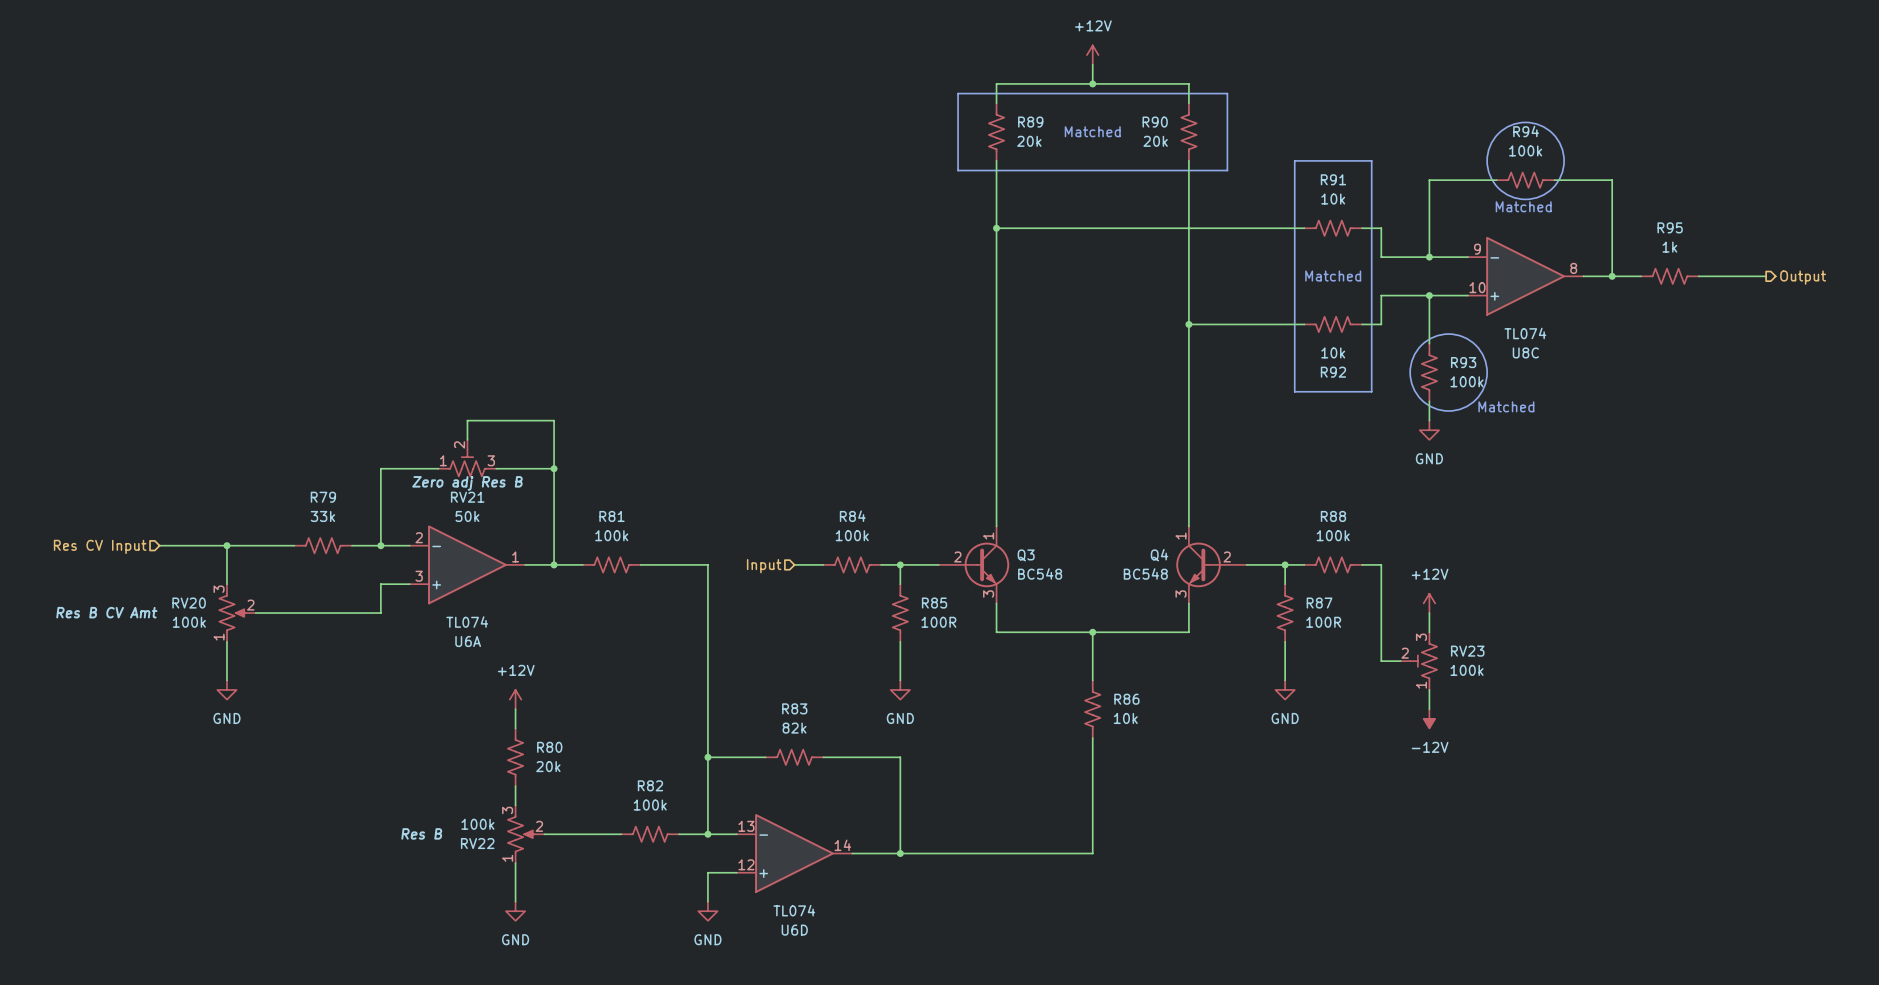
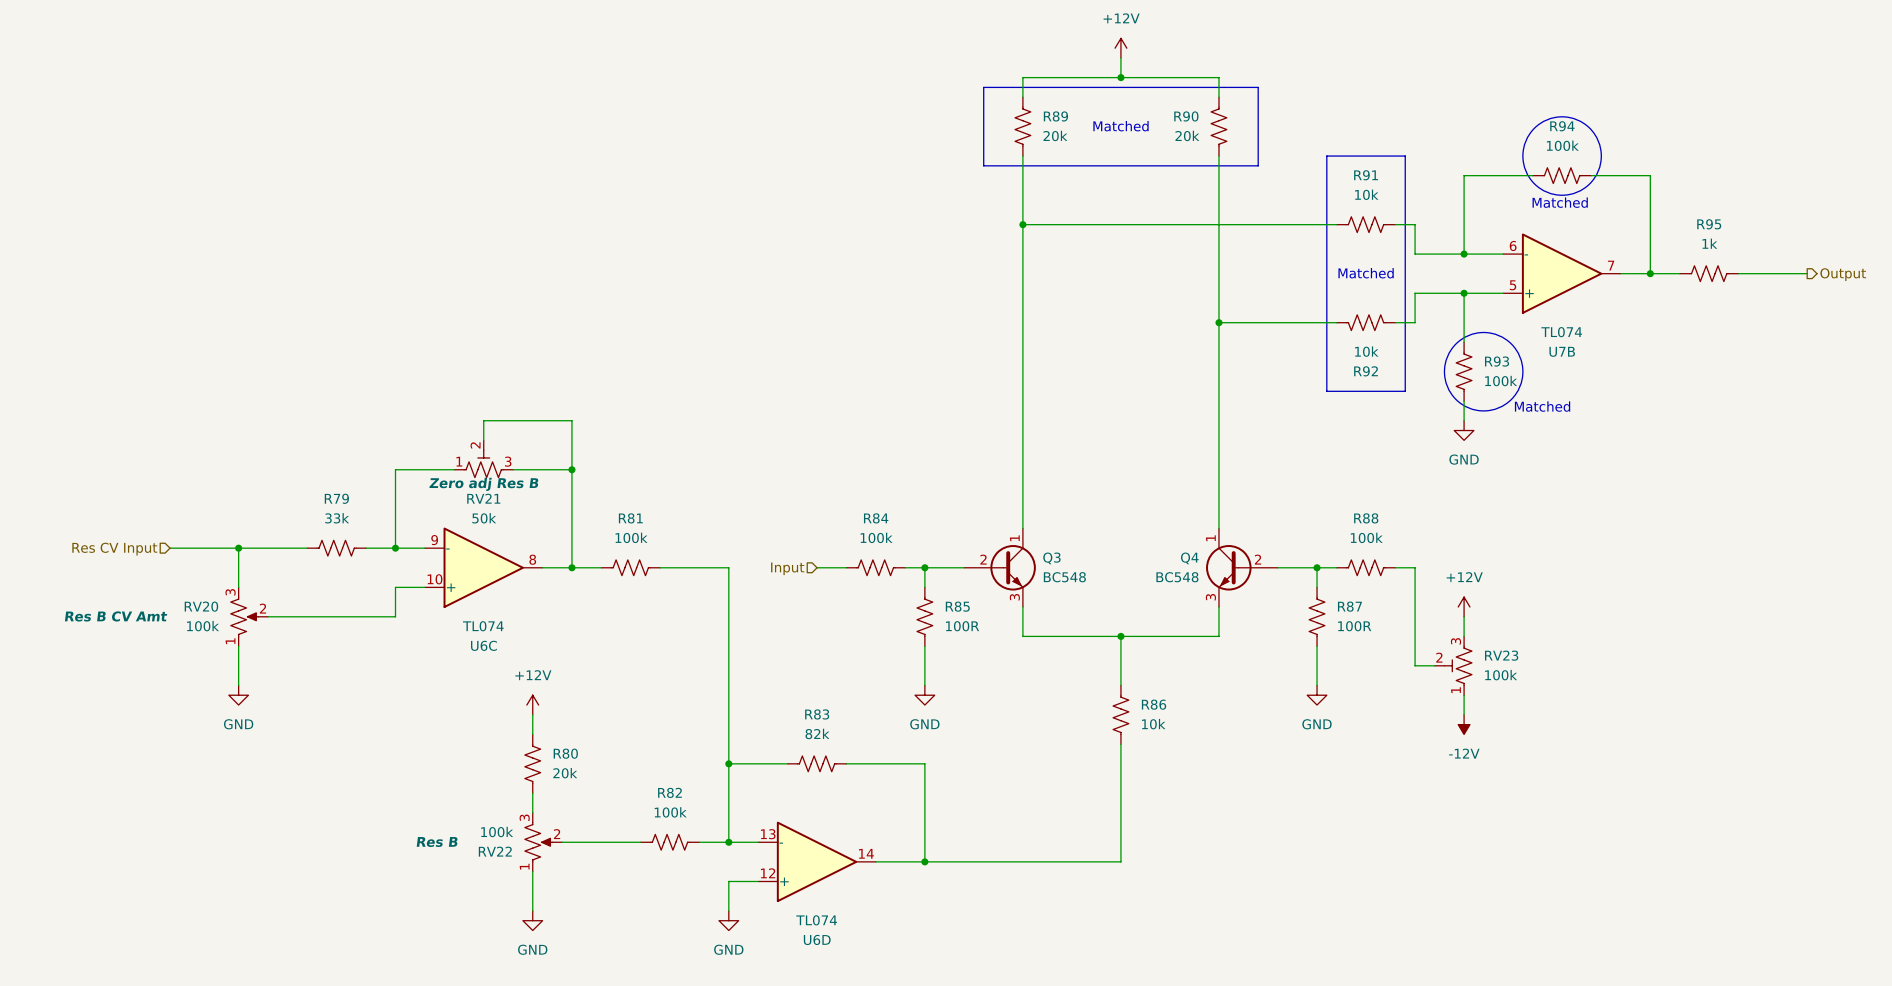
U8C pin number: 9 (1477, 249) -> 6 (1513, 245)
U8C pin number: 8 (1573, 268) -> 7 (1611, 265)
U8C pin number: 10 (1477, 287) -> 5 (1513, 285)
U8C name: U8C (1525, 352) -> U7B (1562, 351)
U6A pin number: 2 (419, 537) -> 9 (434, 540)
U6A pin number: 1 (515, 556) -> 8 (532, 559)
U6A pin number: 3 (419, 576) -> 10 (435, 579)
U6A name: U6A (468, 641) -> U6C (483, 645)

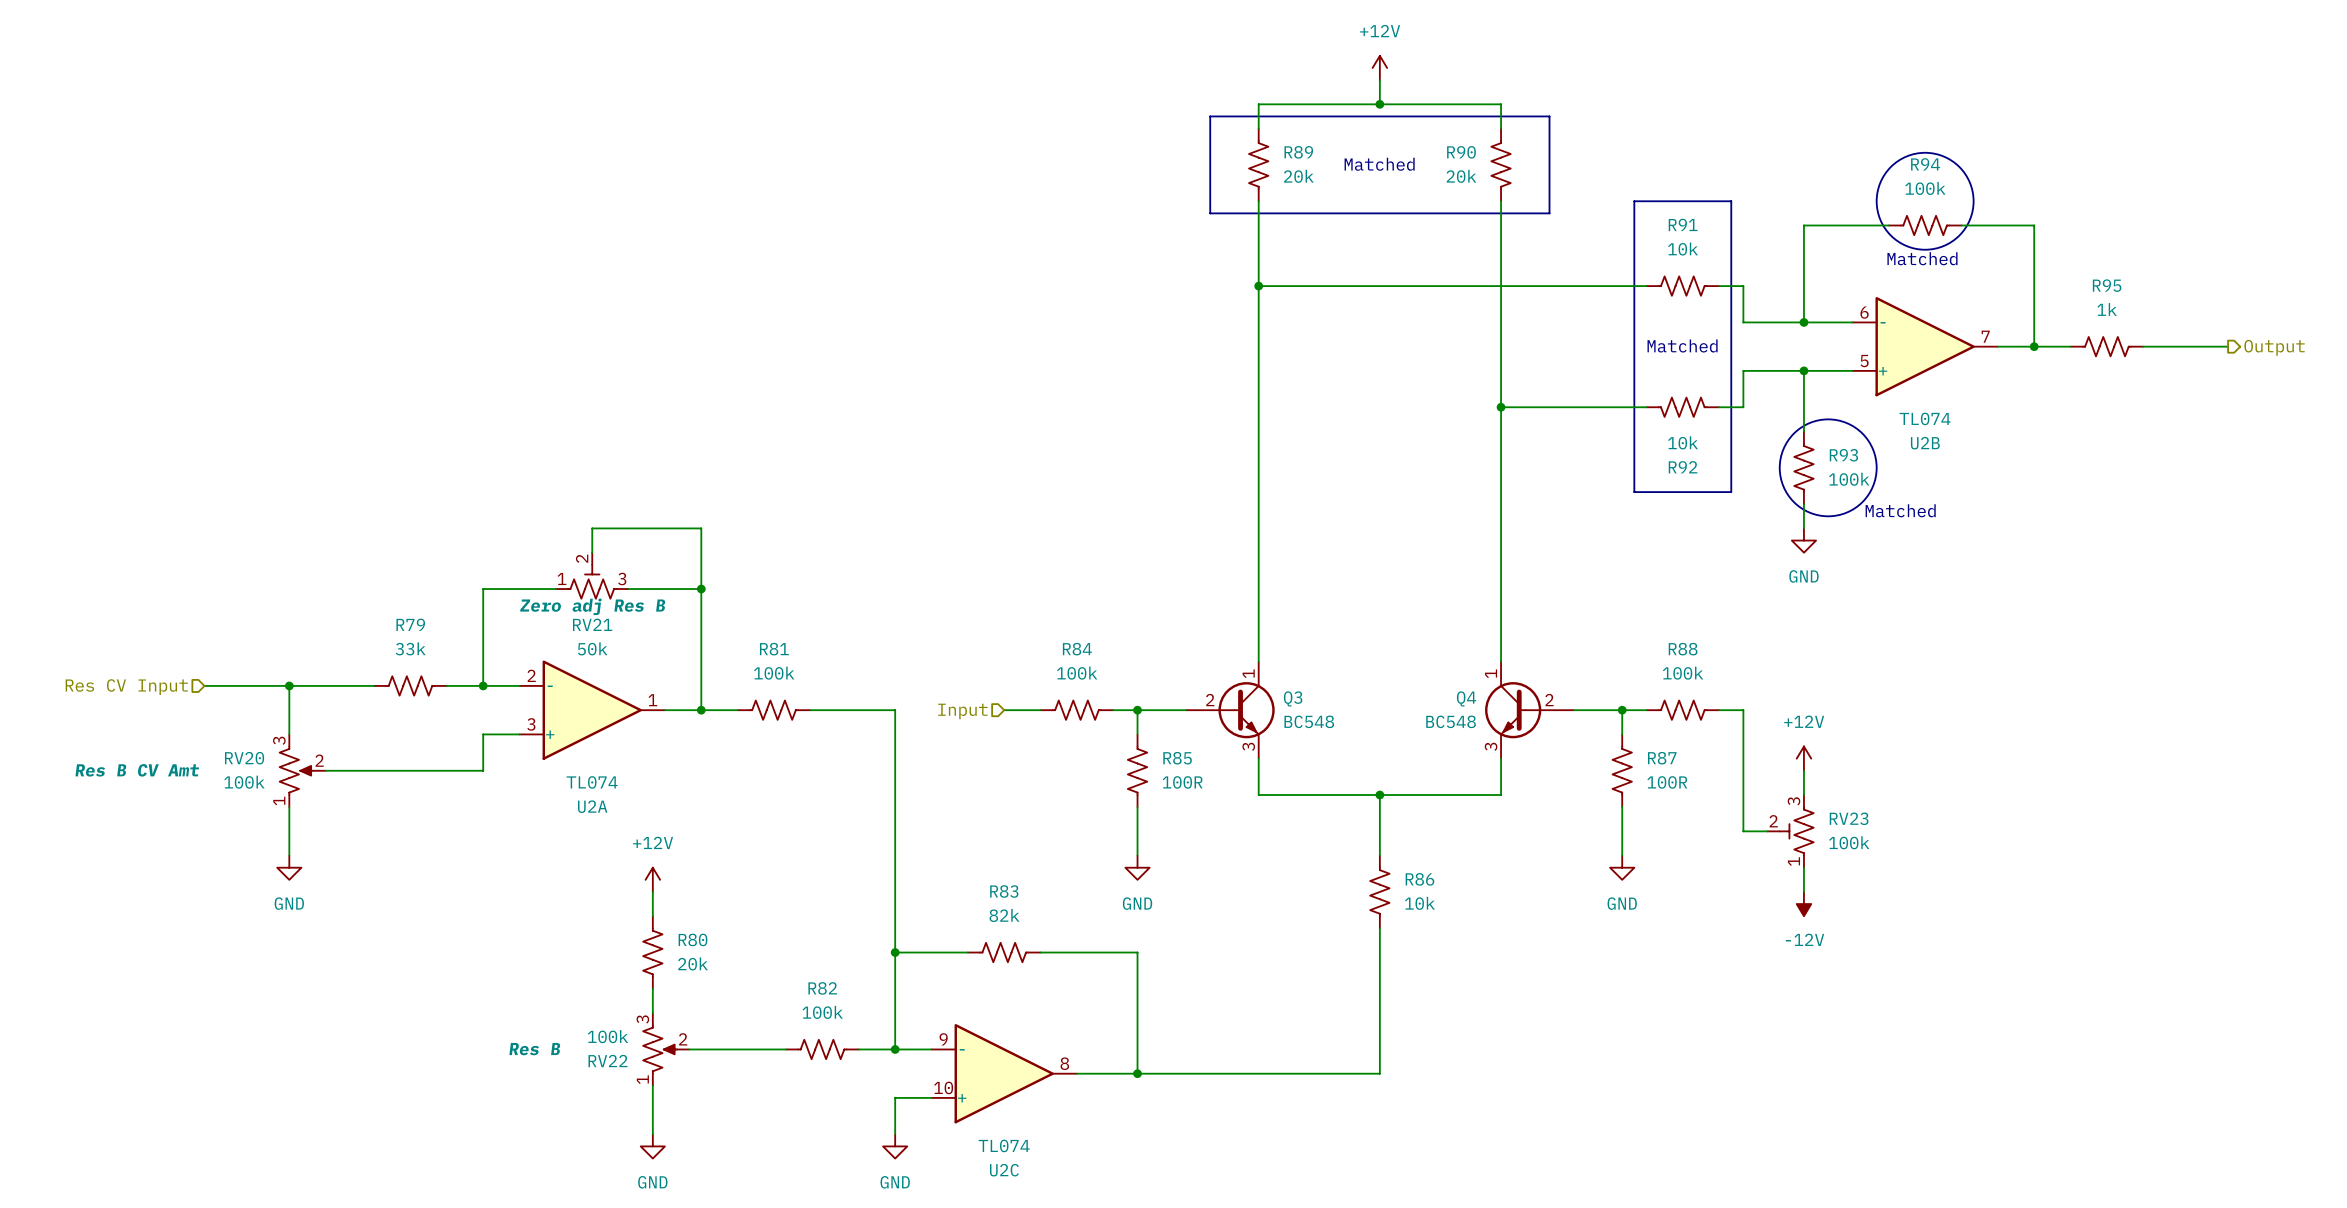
U7B name: U7B (1562, 351) -> U2B (1925, 443)
U6C pin number: 9 (434, 540) -> 2 (531, 675)
U6C pin number: 8 (532, 559) -> 1 (652, 700)
U6C pin number: 10 (435, 579) -> 3 (531, 724)
U6C name: U6C (483, 645) -> U2A (592, 806)
U6D pin number: 13 (768, 834) -> 9 (943, 1039)
U6D pin number: 14 (866, 853) -> 8 (1064, 1063)
U6D pin number: 12 (768, 873) -> 10 (943, 1087)
U6D name: U6D (817, 939) -> U2C (1004, 1170)

